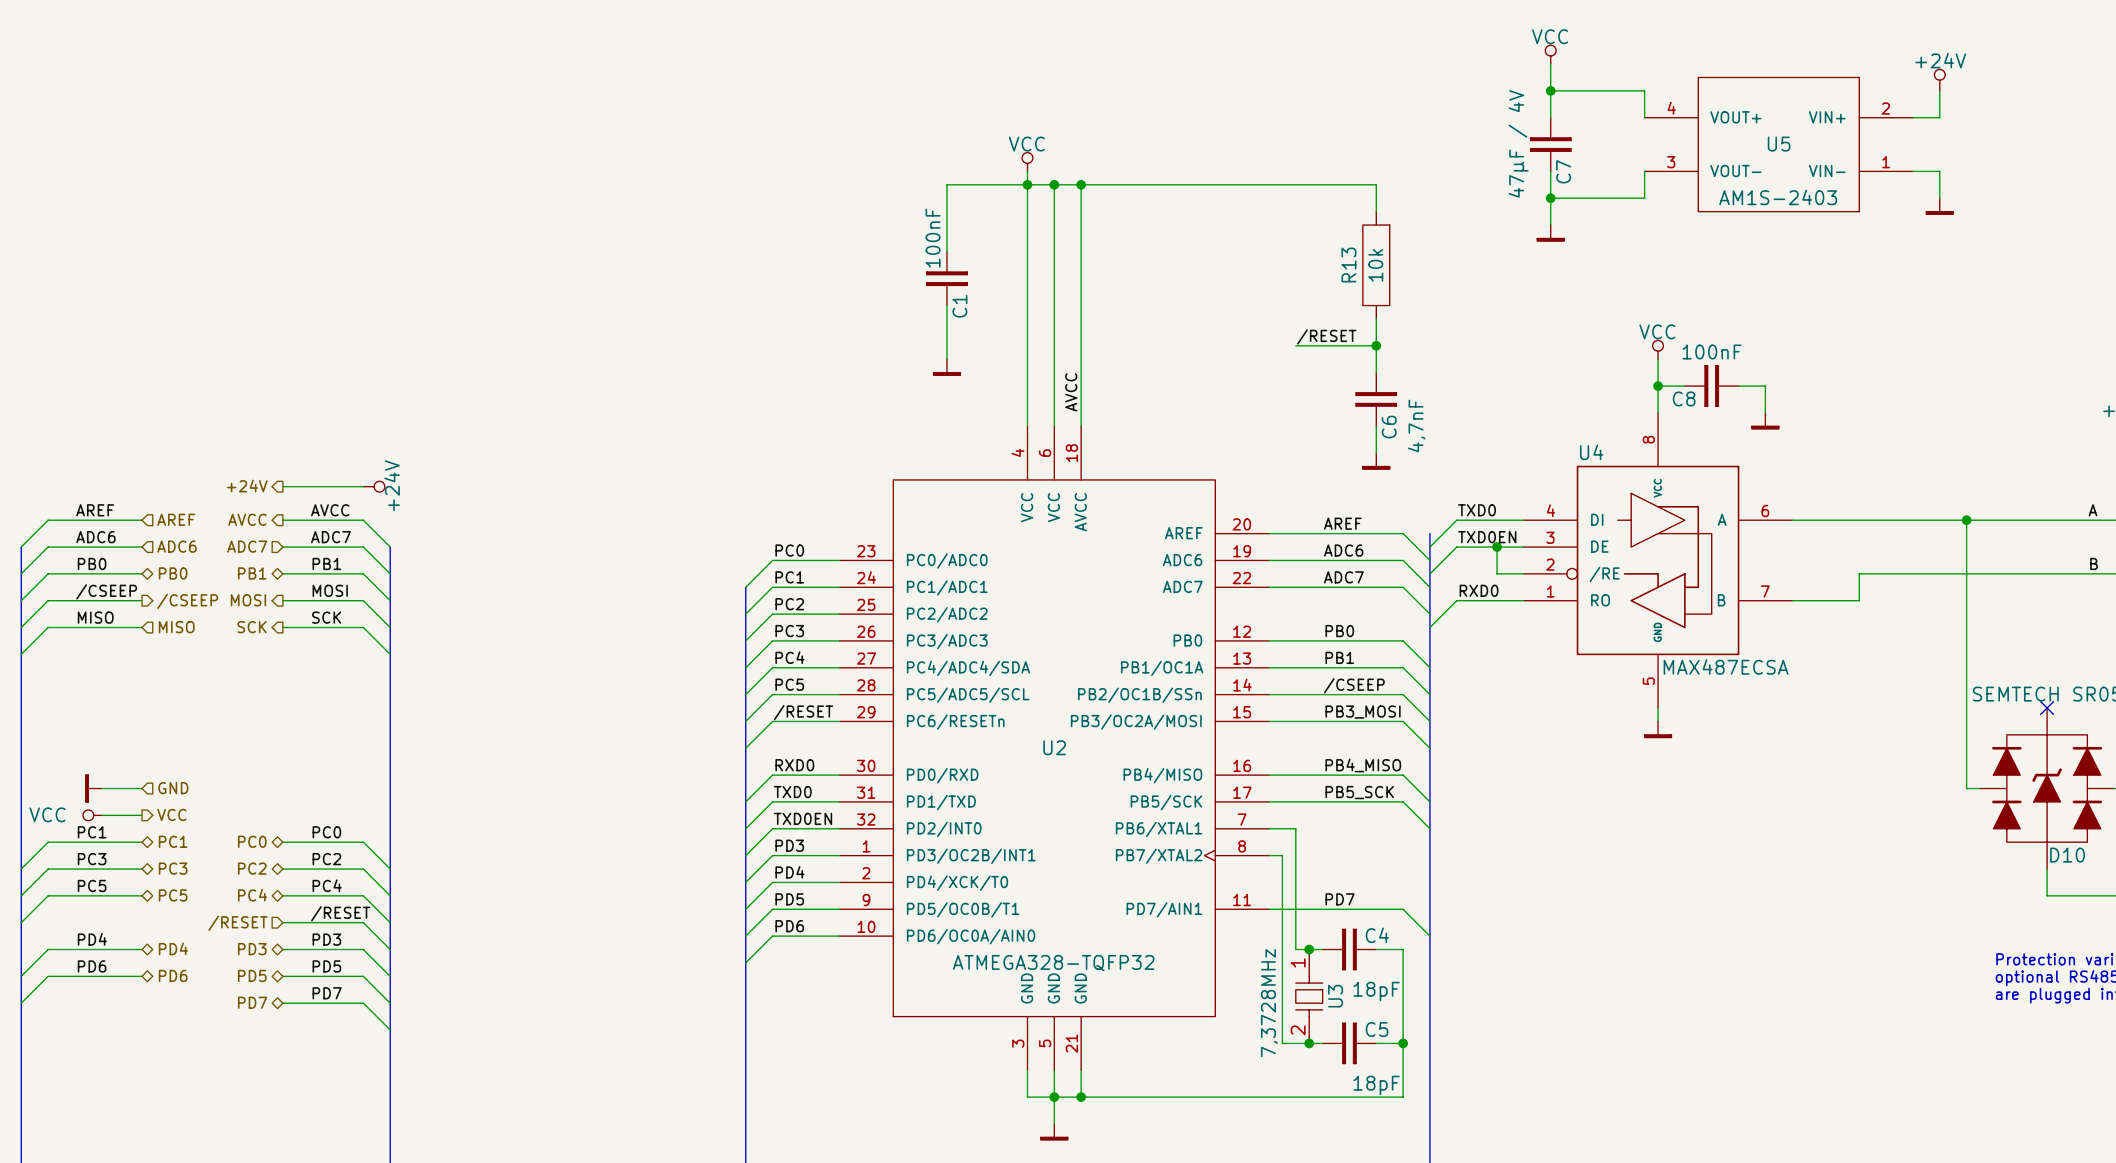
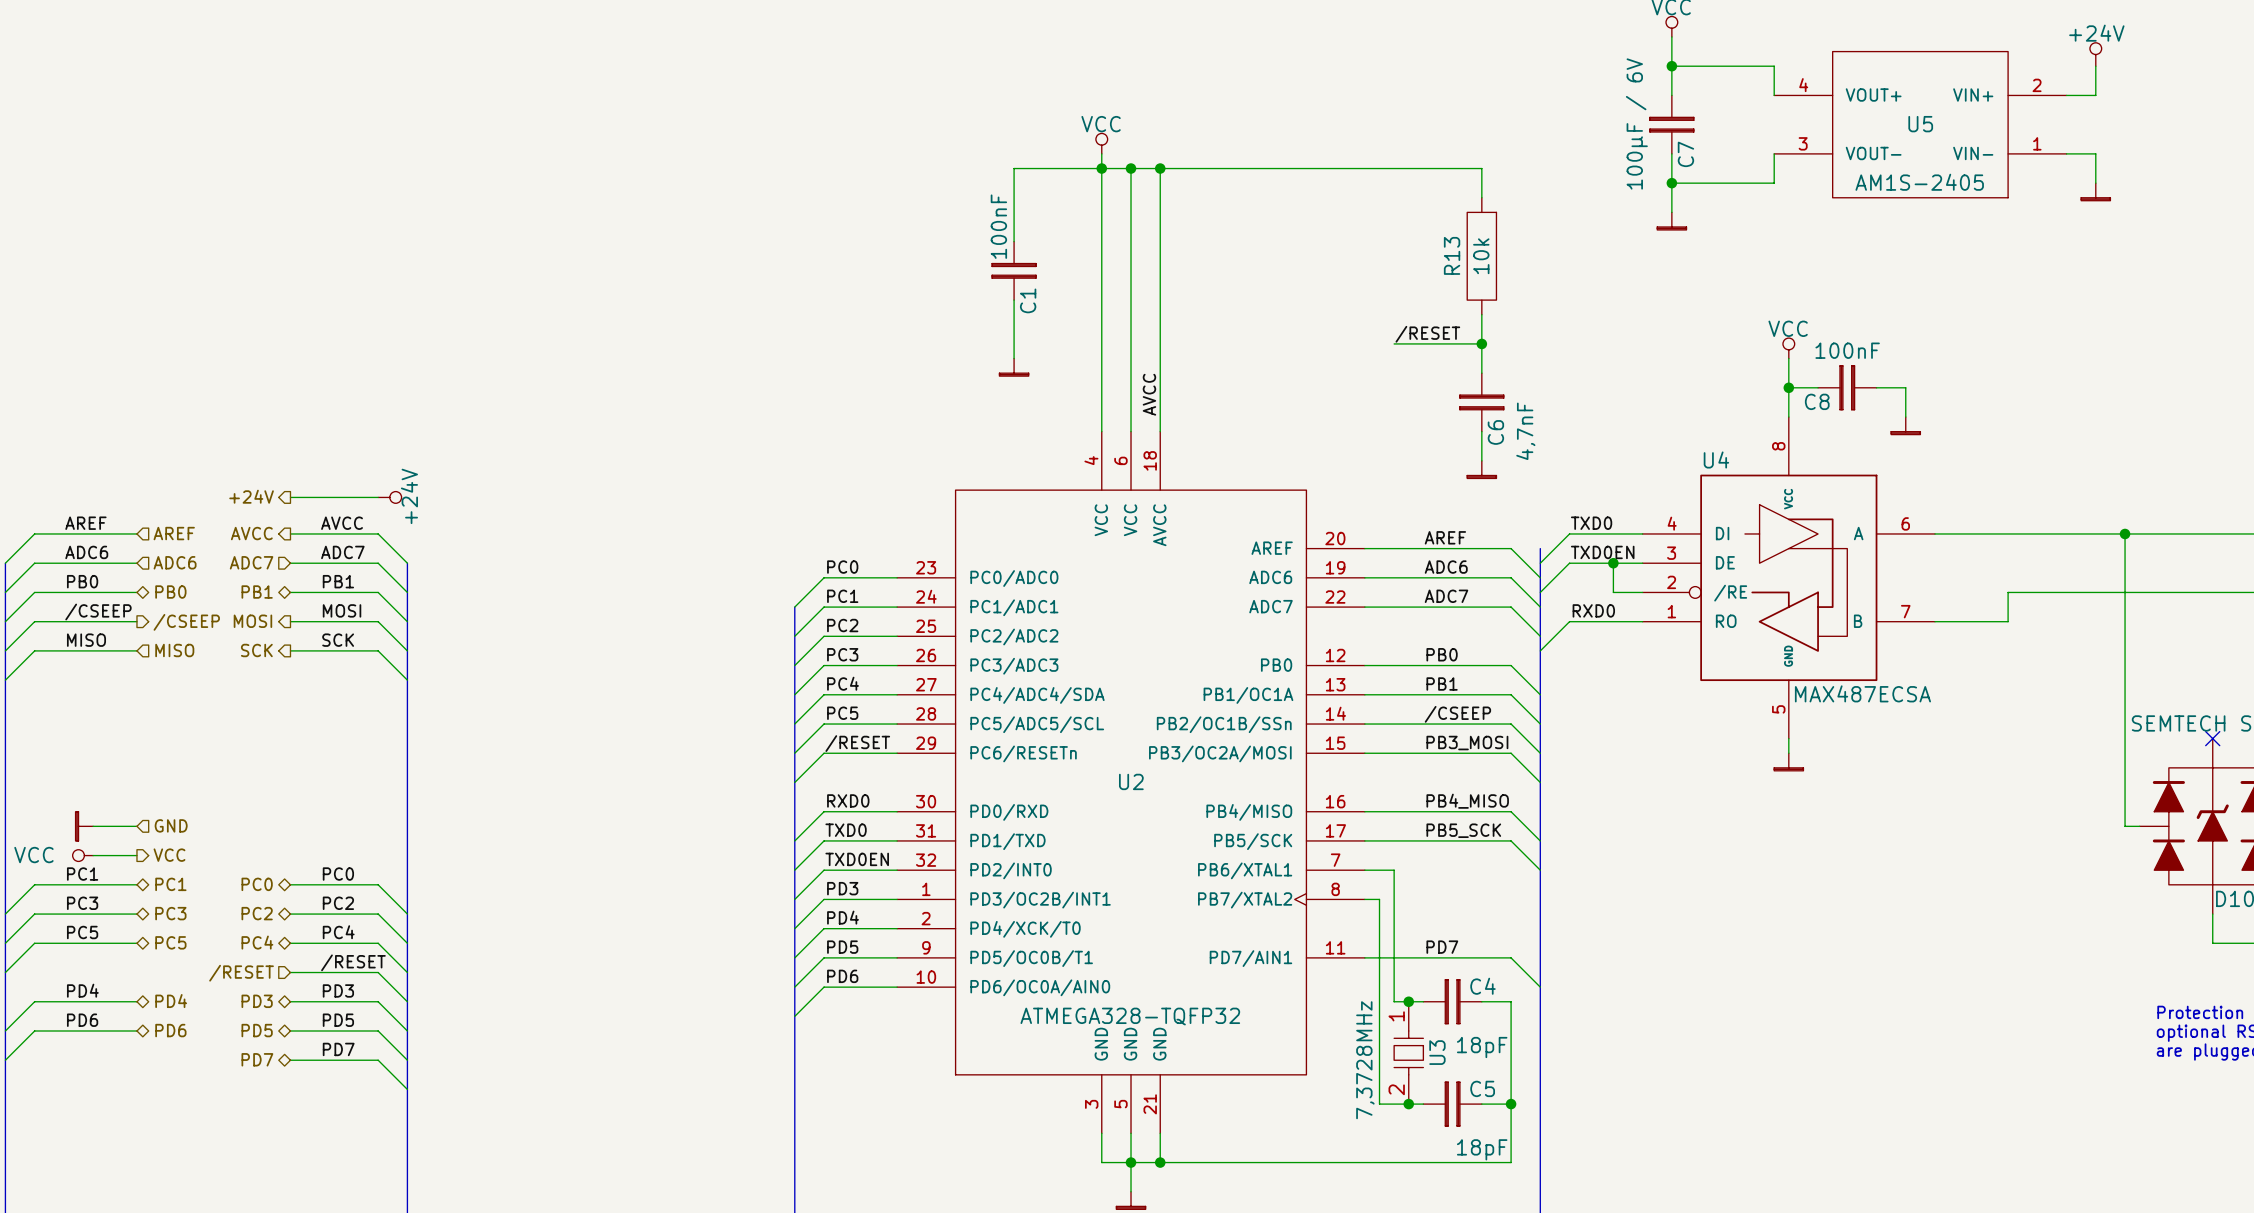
C7 value: 47µF / 4V (1518, 143) -> 100µF / 6V (1636, 123)
U5 value: AM1S-2403 (1778, 197) -> AM1S-2405 (1919, 182)

